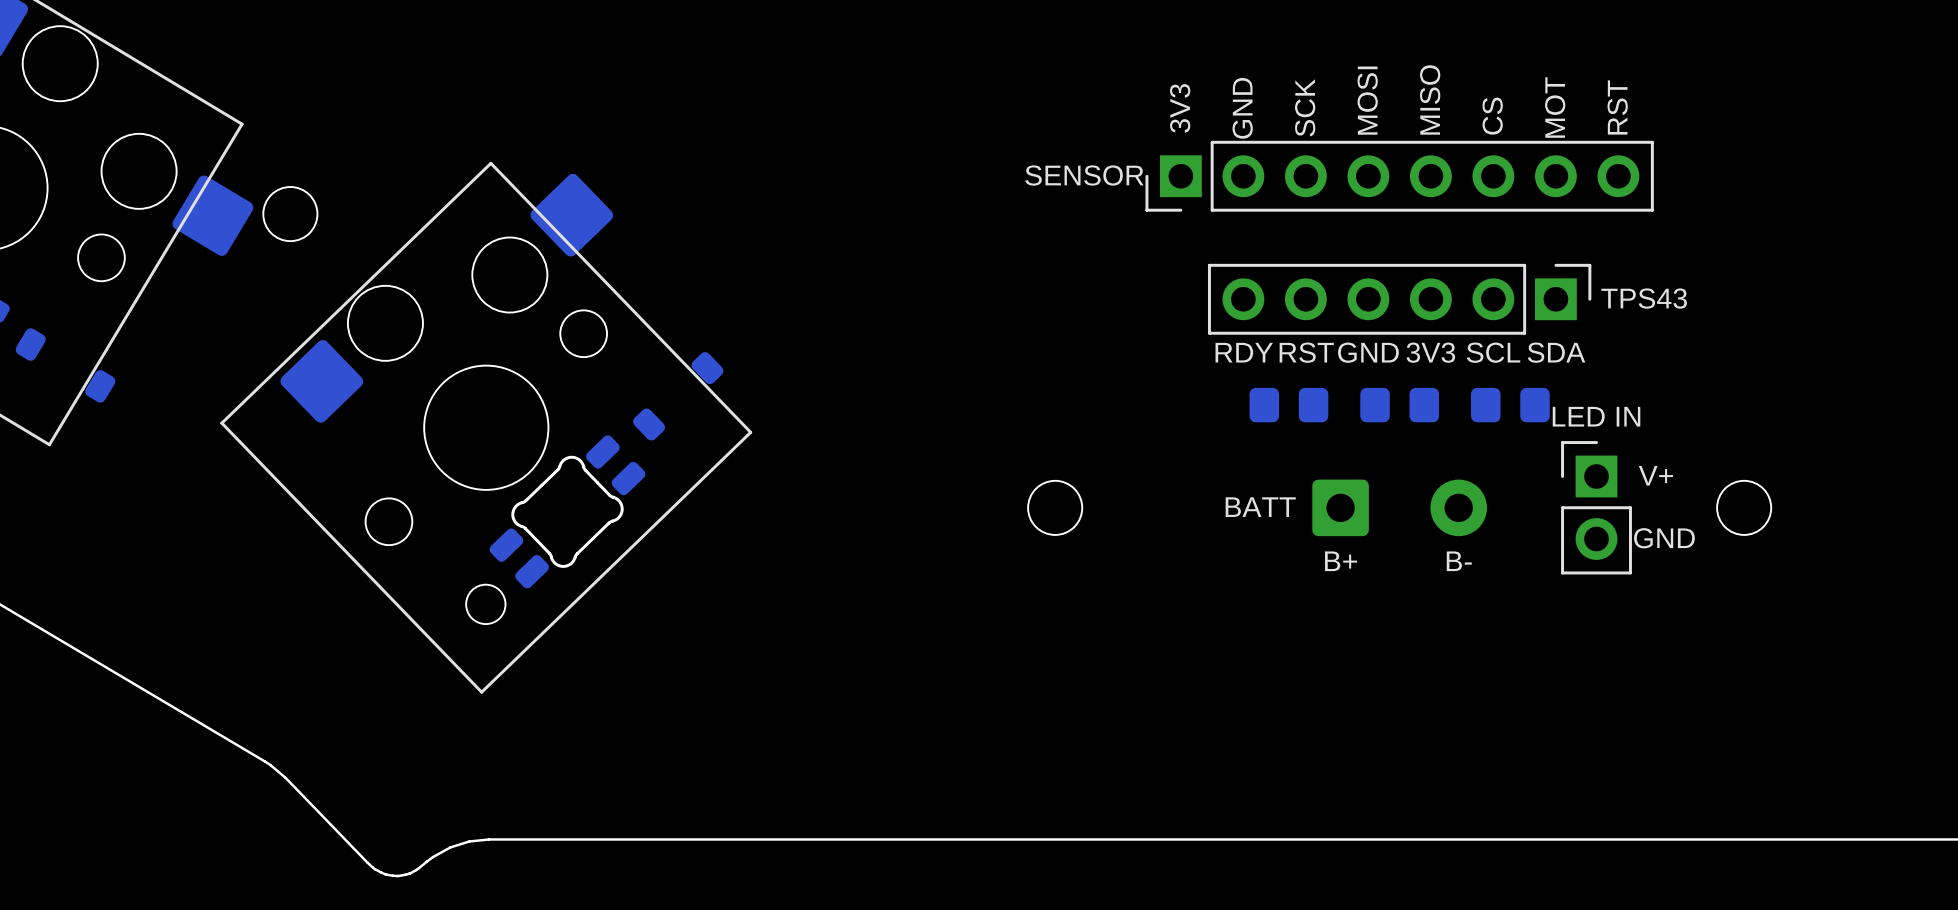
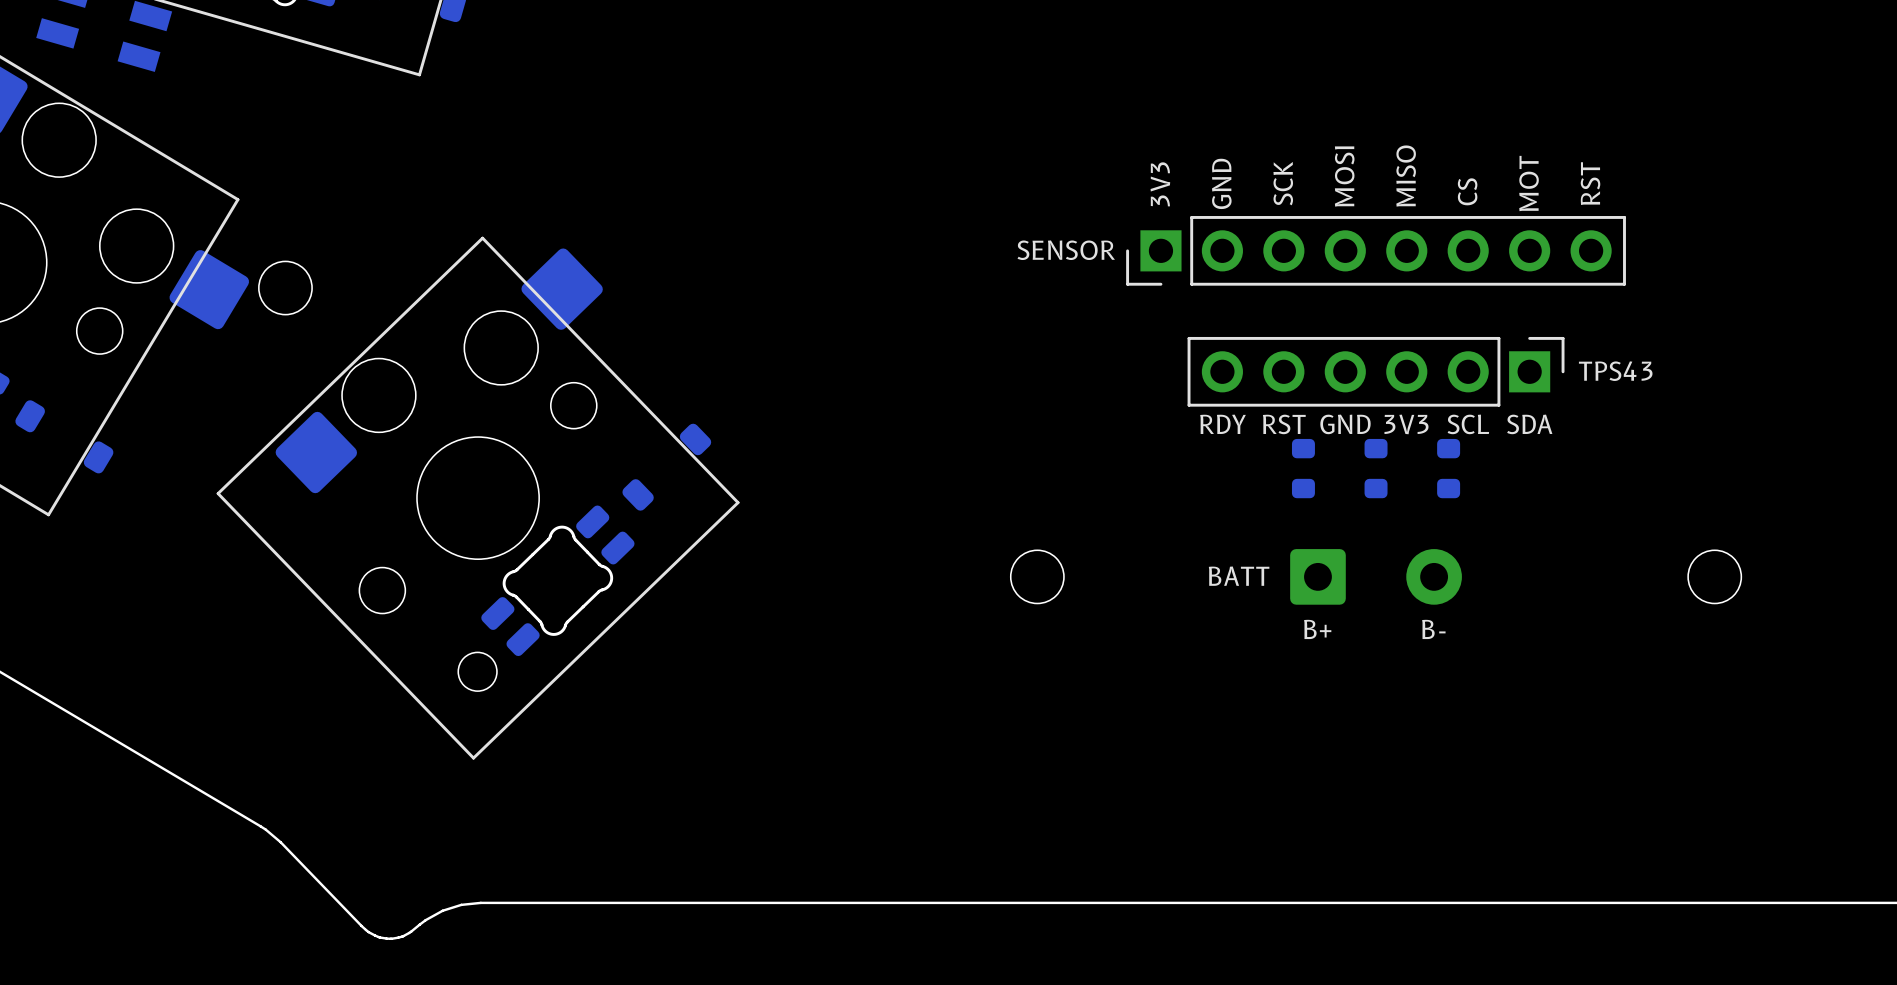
part footprint: [1360, 387, 1440, 423] -> [1364, 438, 1388, 499]
part: none -> (1303, 468)
part: none -> (1448, 468)
part: (1288, 405) -> none
part: (1510, 405) -> none
text: LED IN (1596, 416) -> none
text: V+ (1655, 475) -> none
part: (1596, 507) -> none
text: GND (1664, 538) -> none

